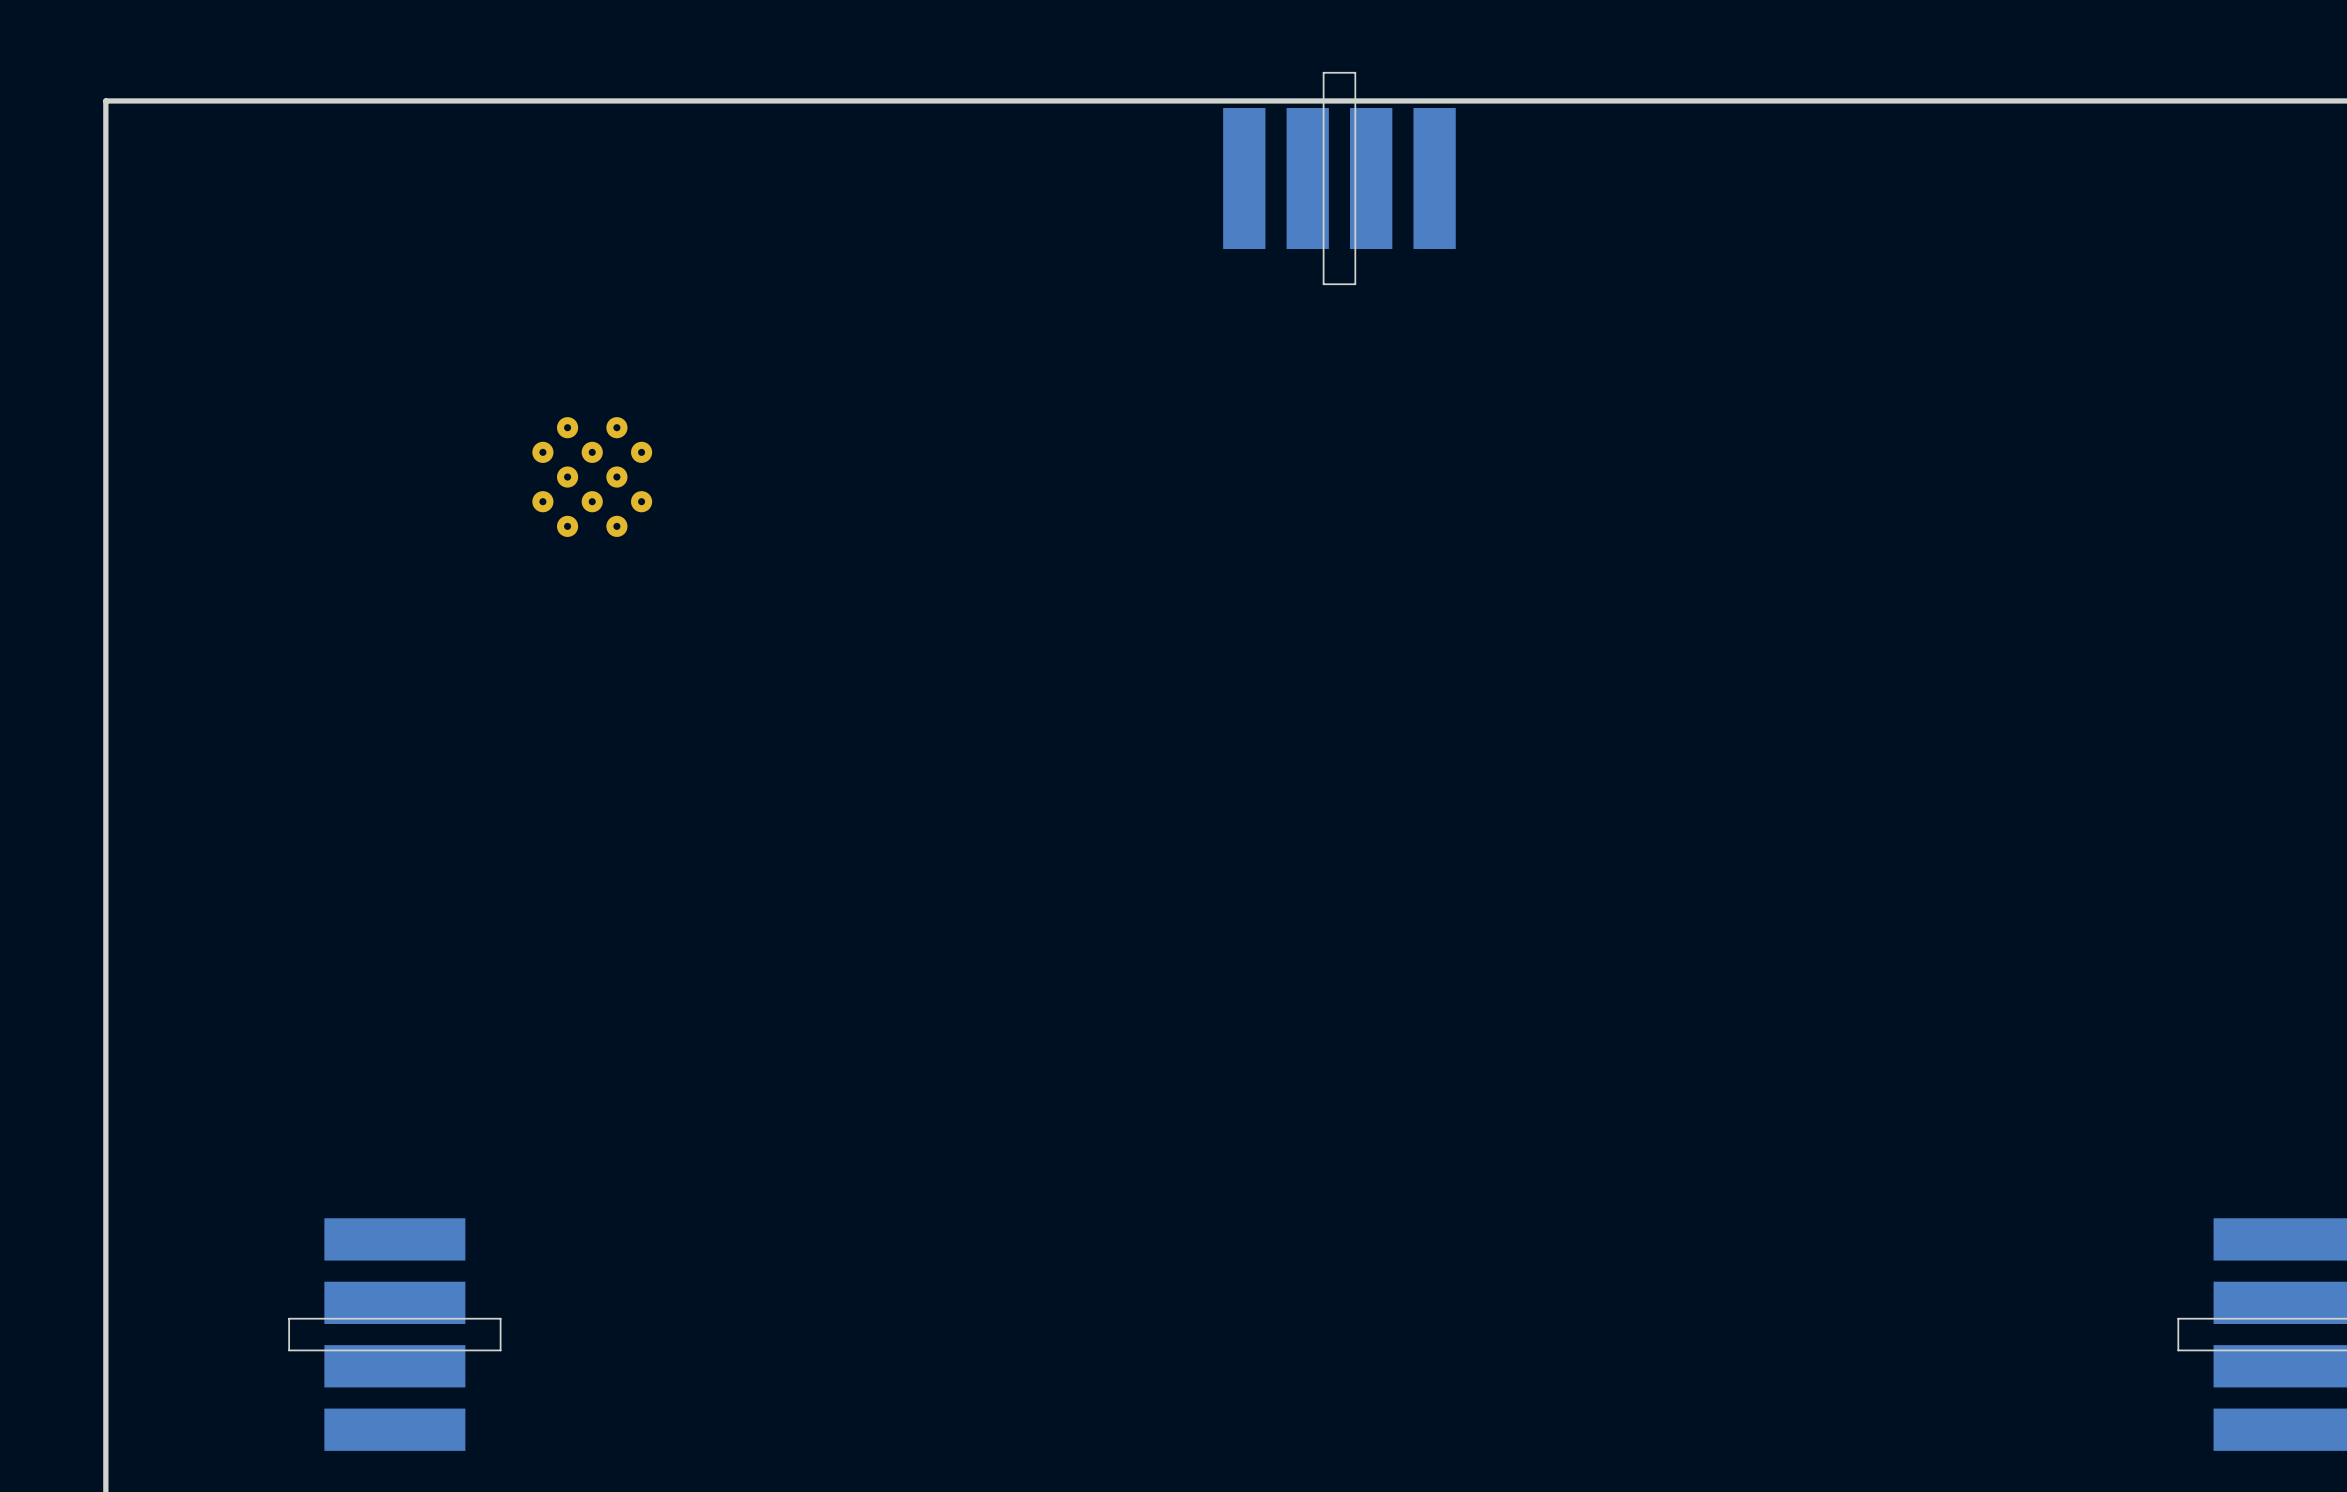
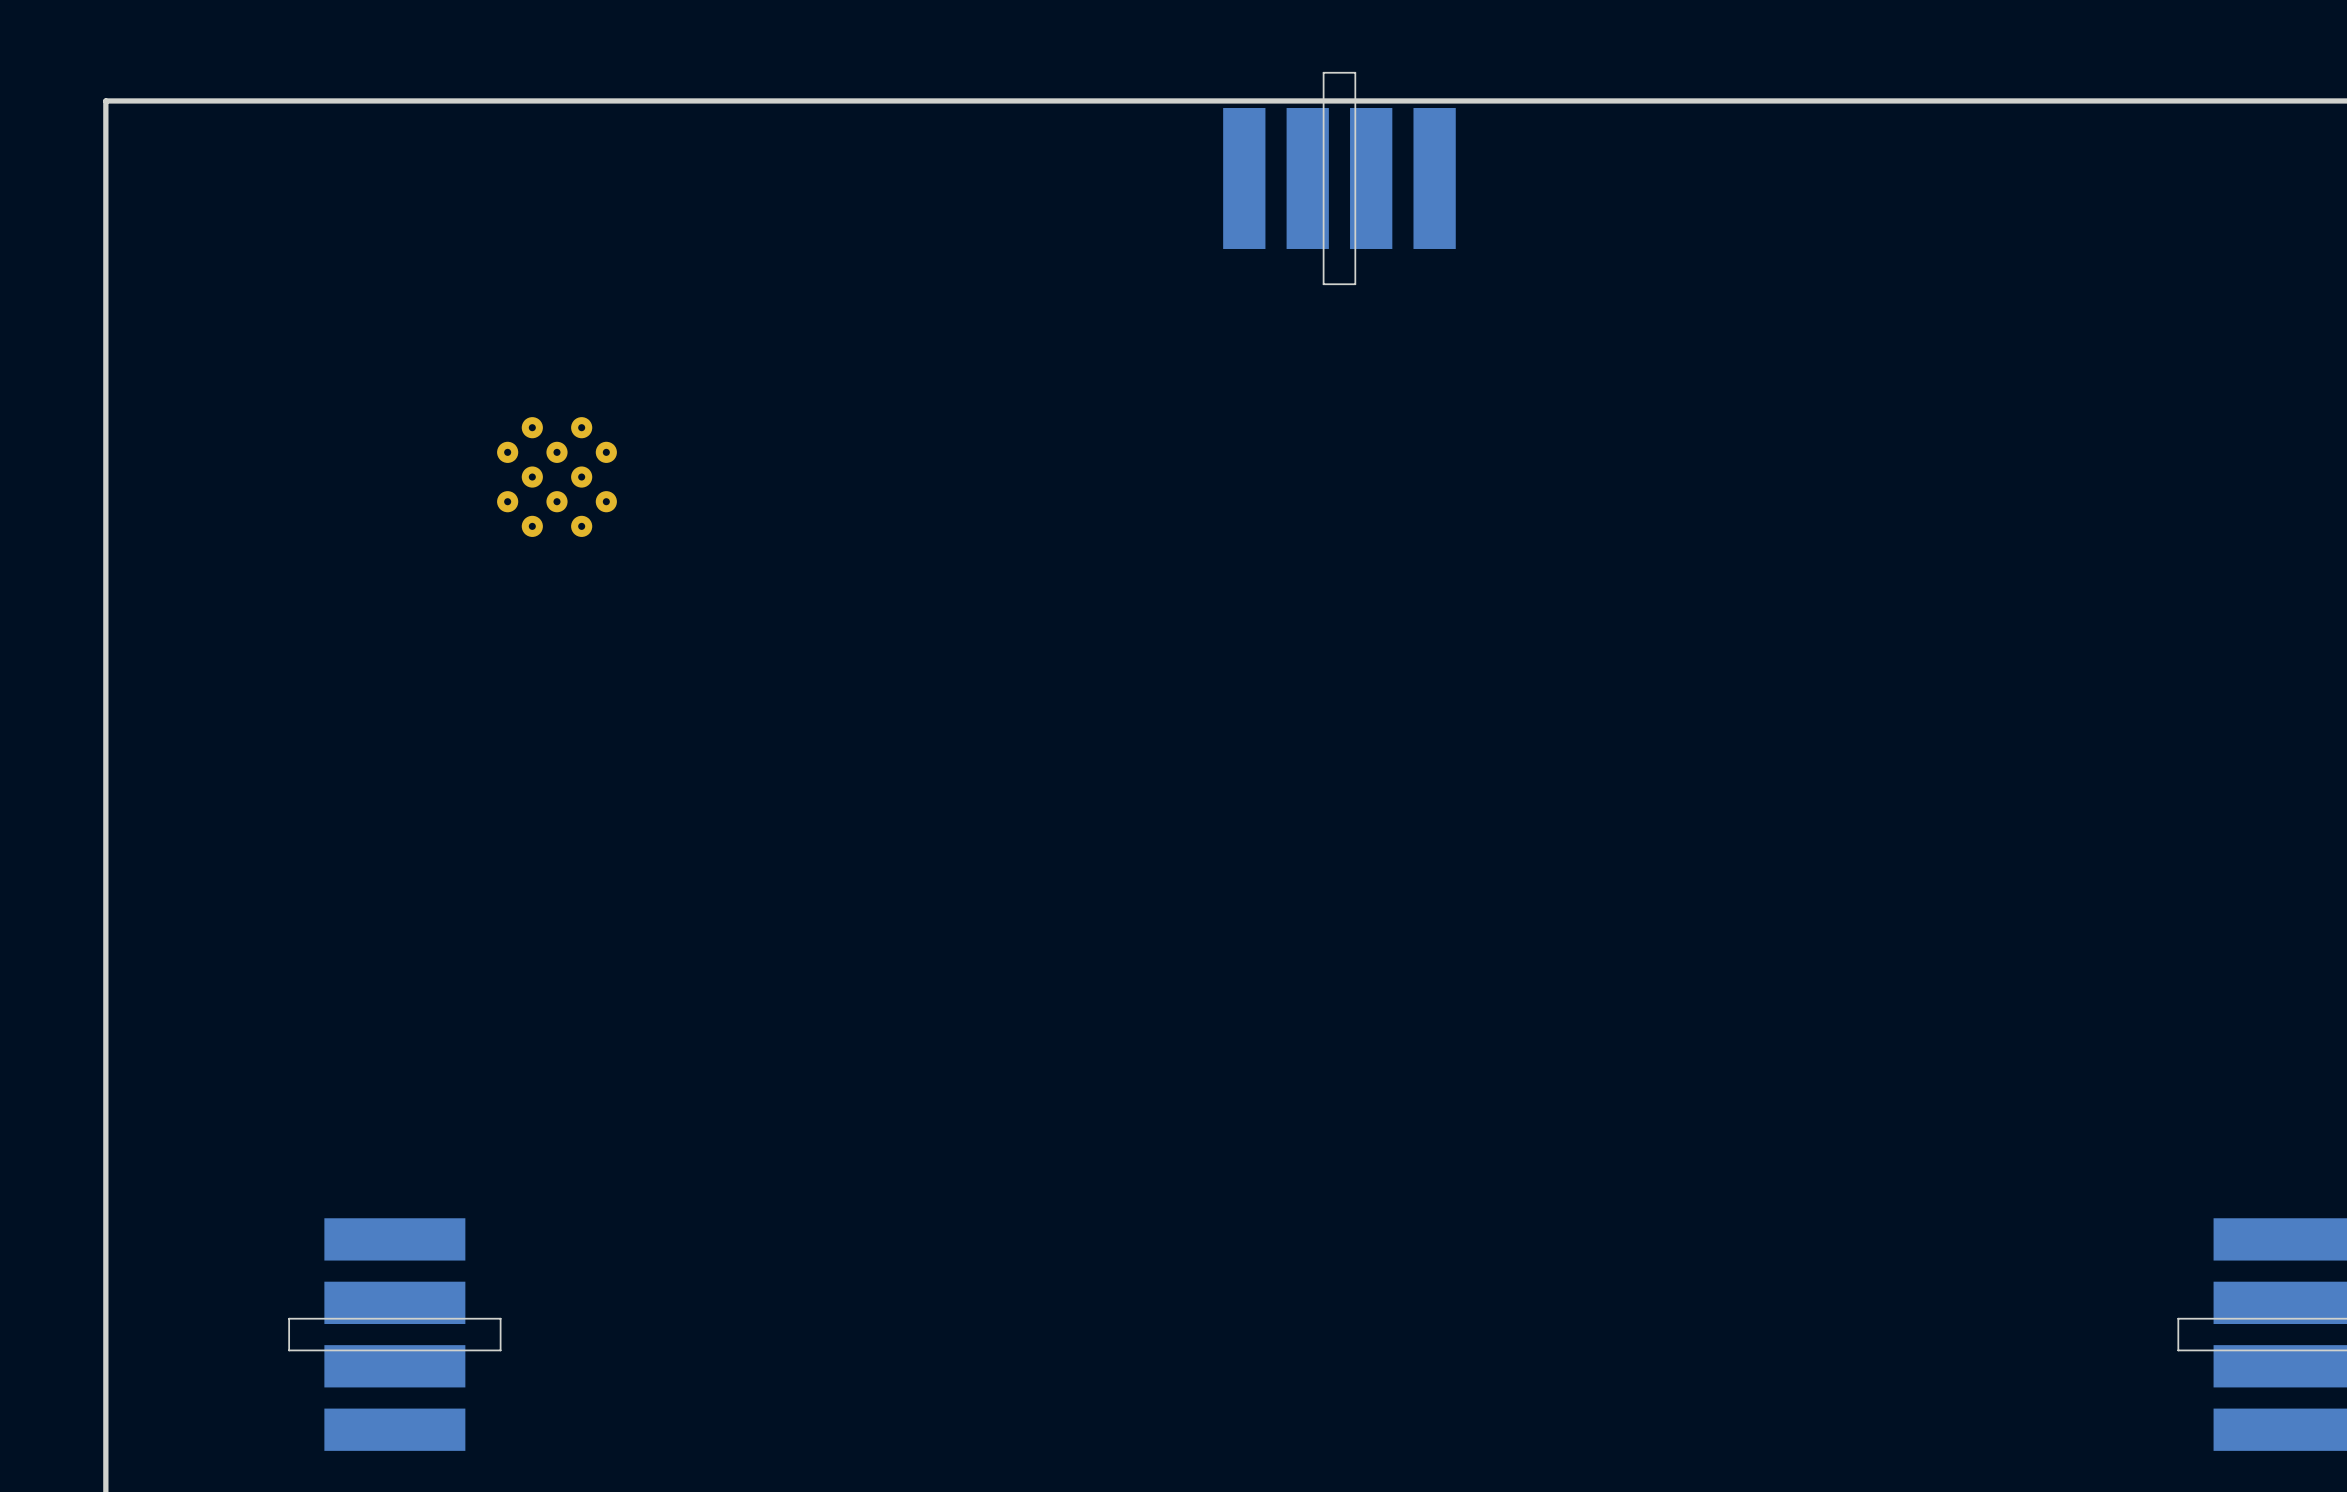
part position: (592, 477) -> (557, 477)

